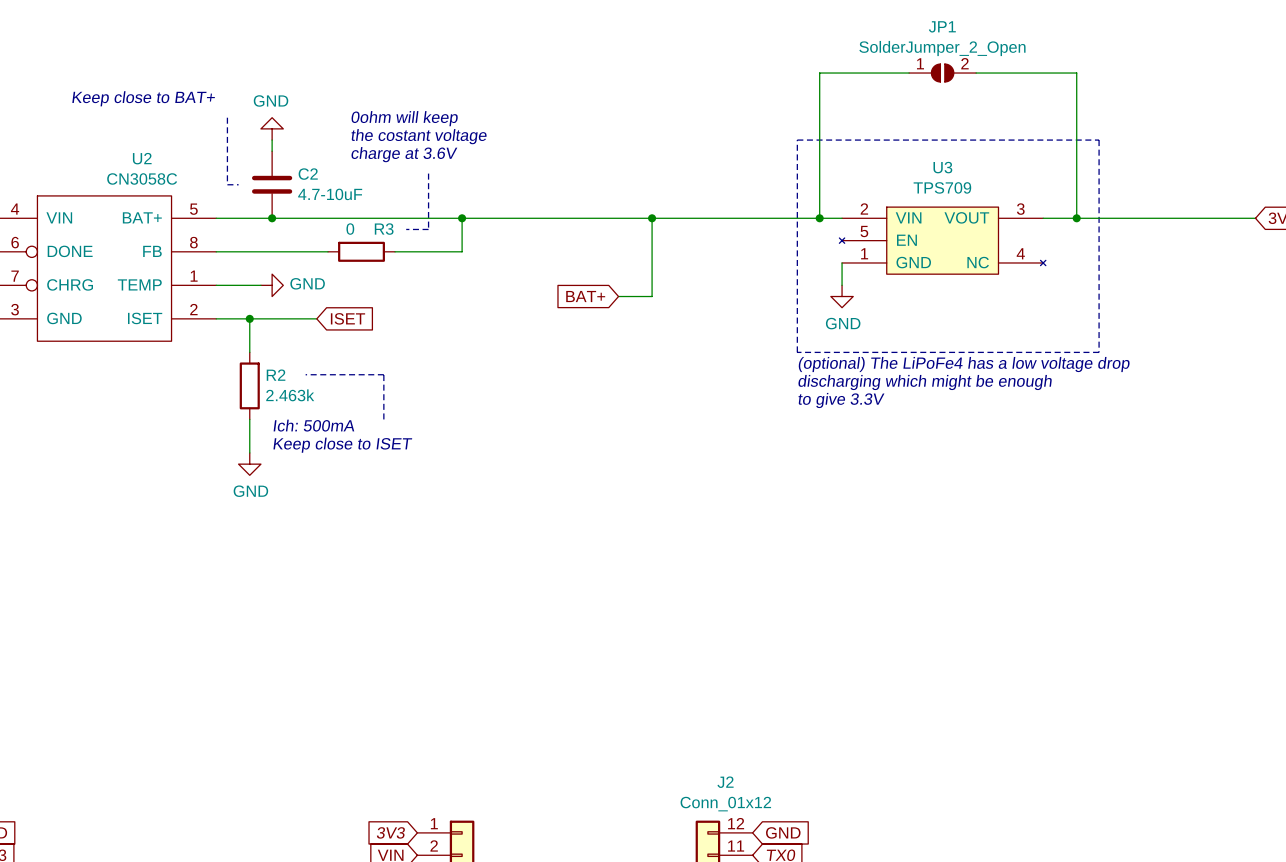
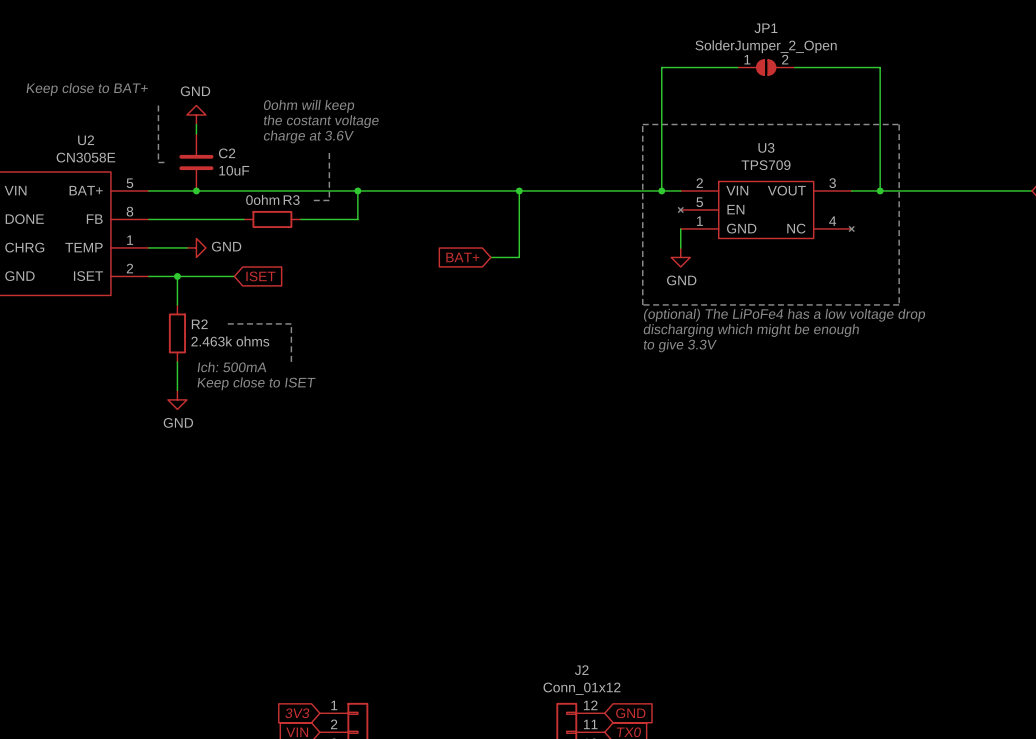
U2 value: CN3058C (142, 178) -> CN3058E (85, 157)
C2 value: 4.7-10uF (330, 194) -> 10uF (234, 170)
R3 value: 0 (350, 229) -> 0ohm (262, 199)
R2 value: 2.463k (290, 395) -> 2.463k ohms (230, 341)

